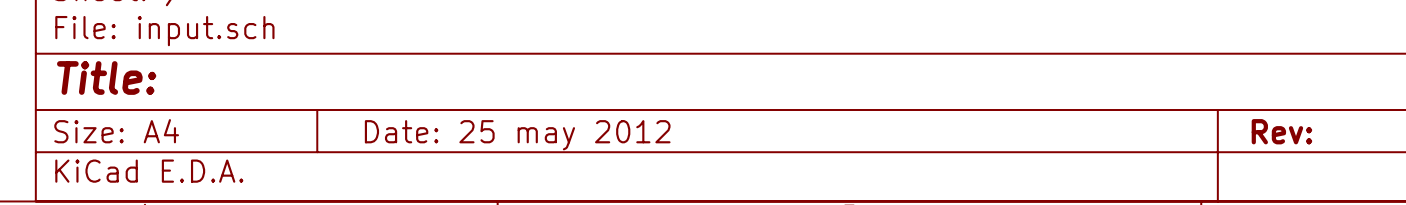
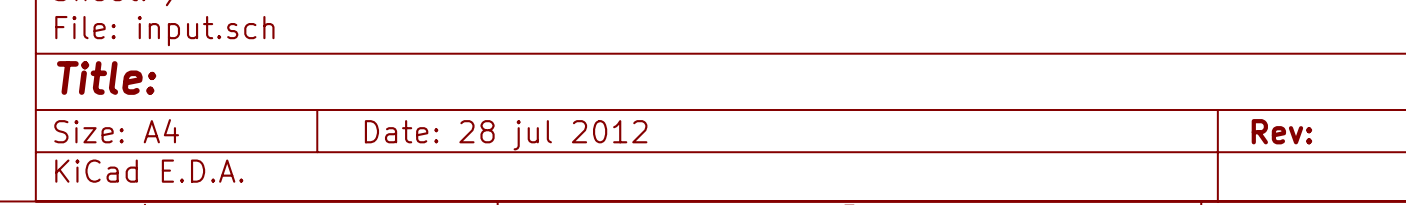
title block: Date: 25 may 2012 (517, 135) -> Date: 28 jul 2012 (506, 135)

